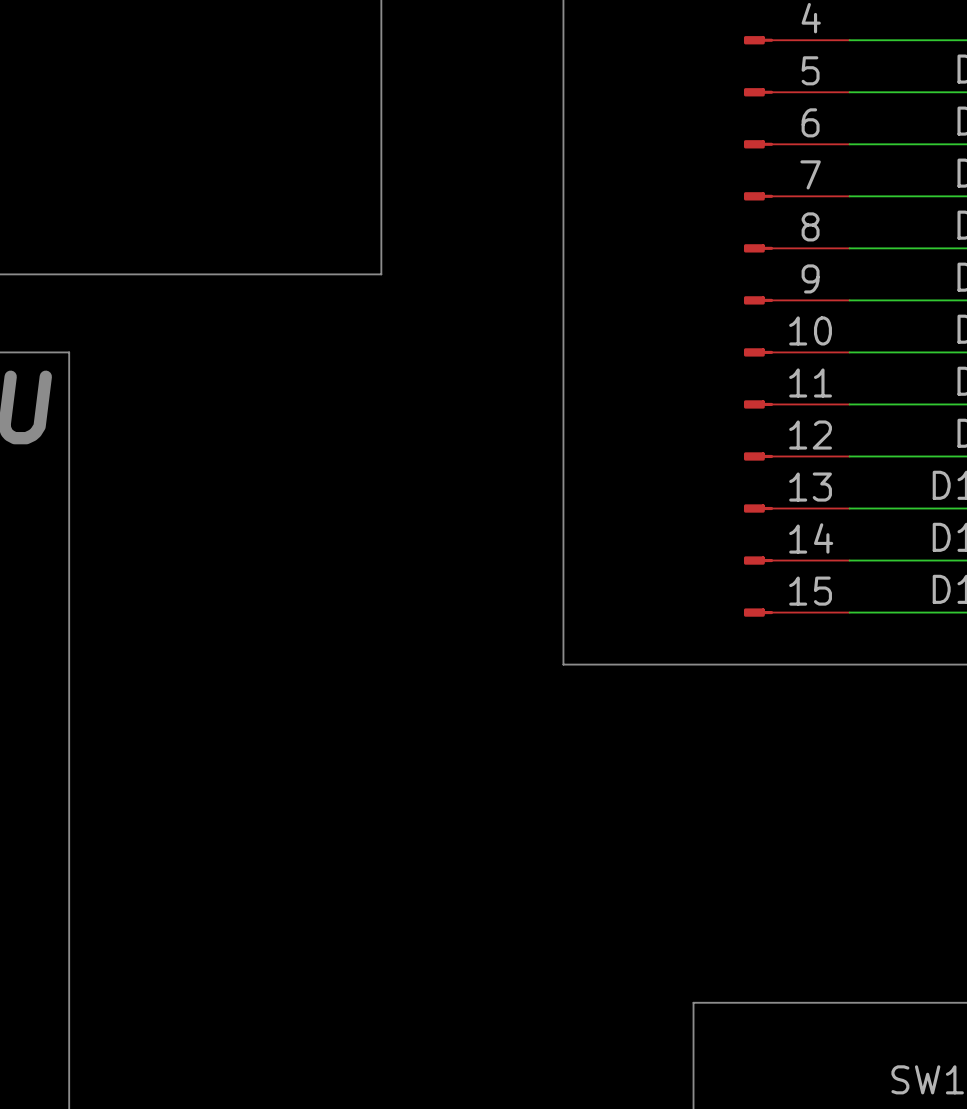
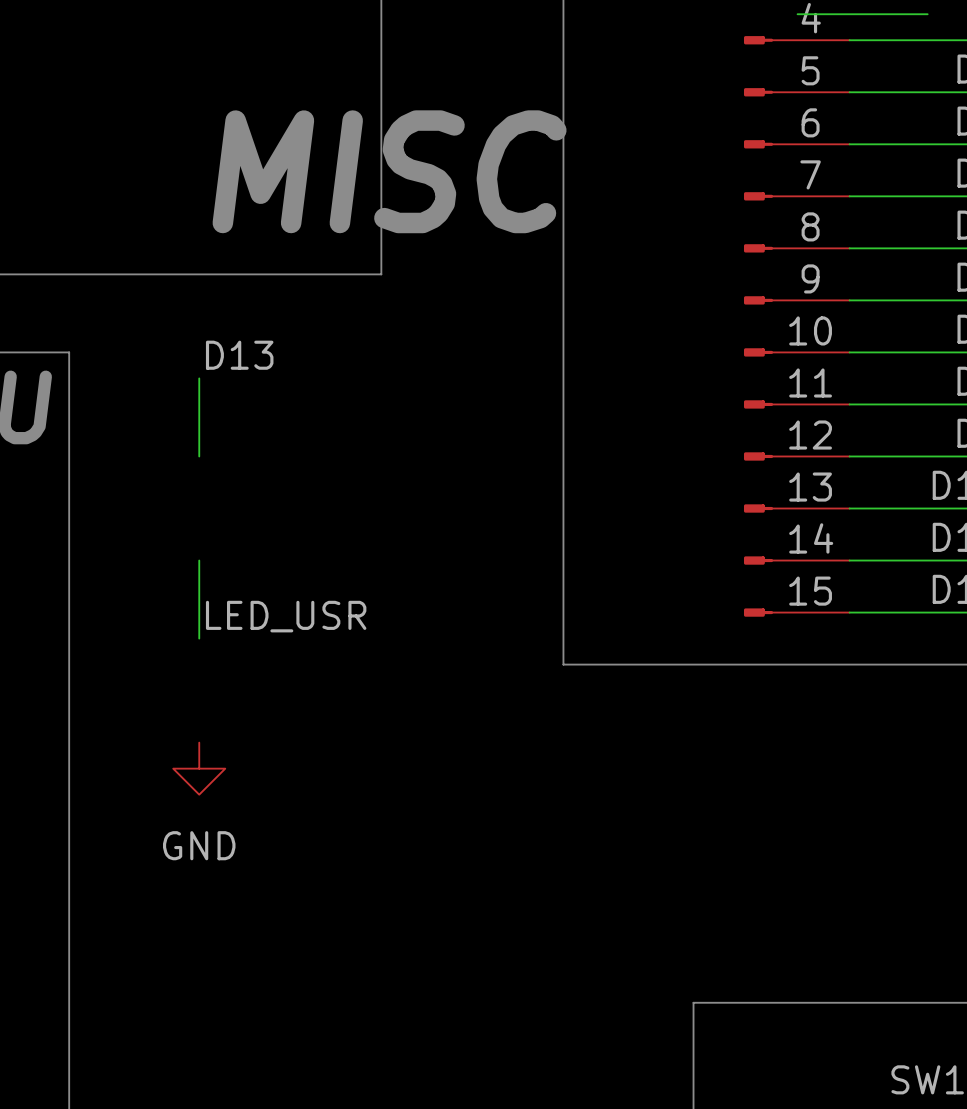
wire: none -> (797, 14) (927, 14)
text: none -> MISC (389, 171)
label: none -> D13 (239, 355)
wire: none -> (199, 378) (199, 456)
wire: none -> (199, 560) (199, 638)
label: none -> LED_USR (286, 616)
power symbol: none -> GND (199, 768)

